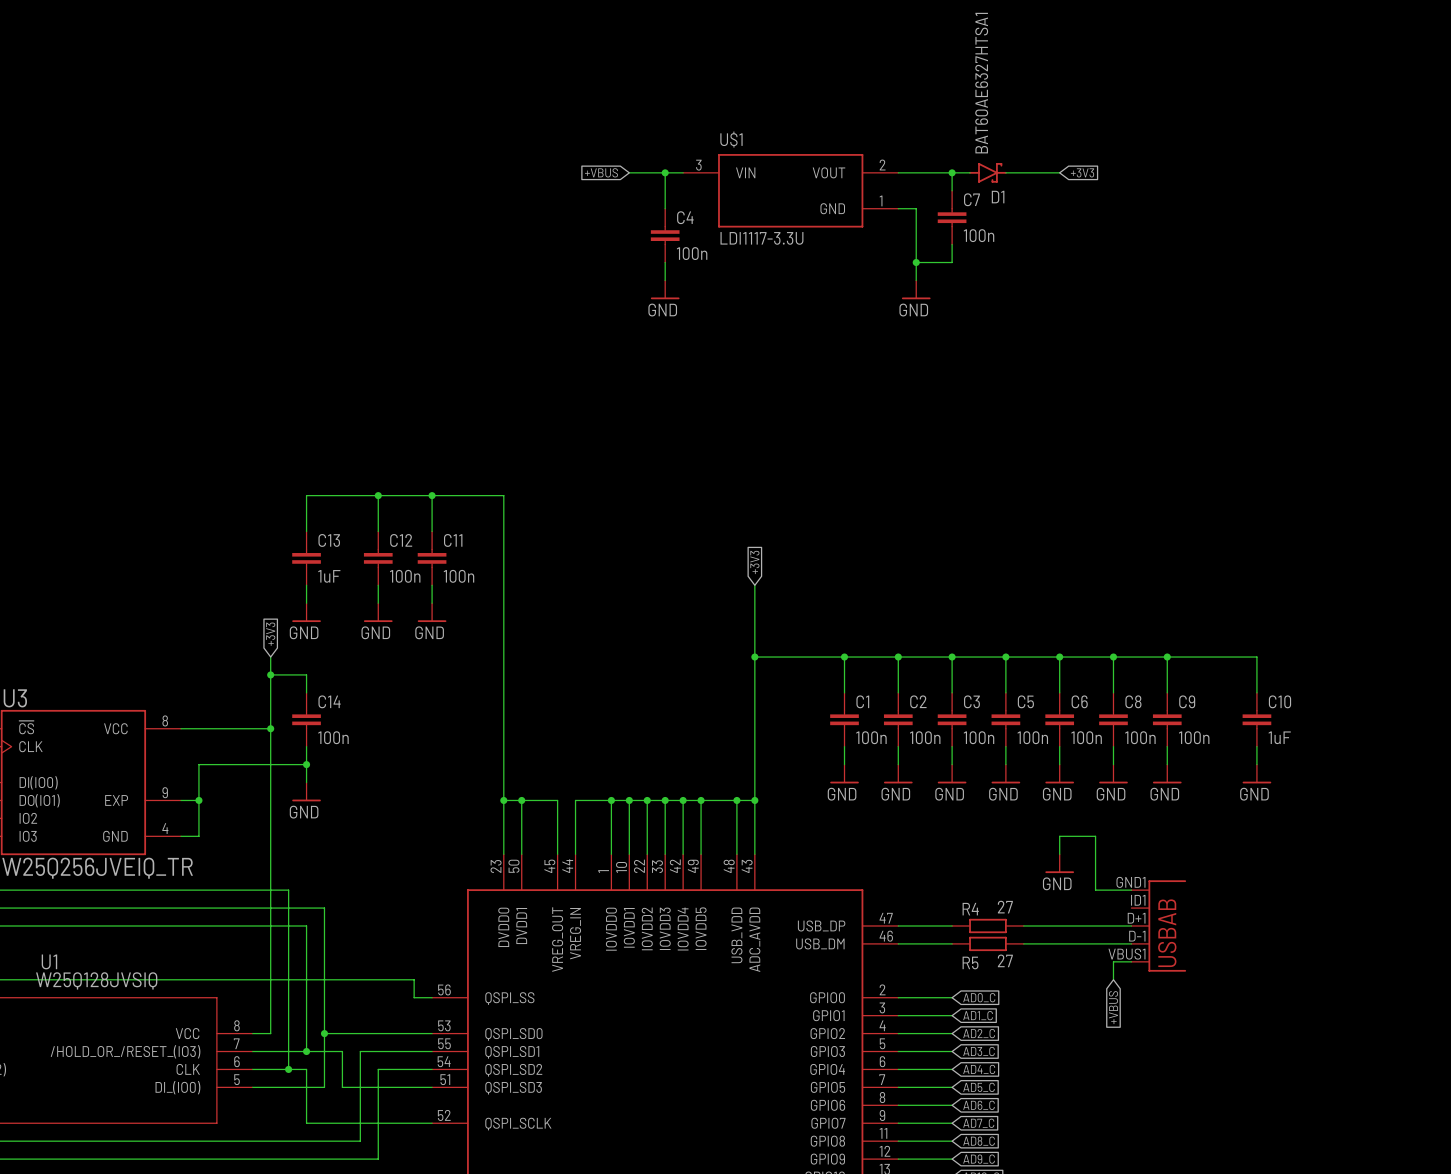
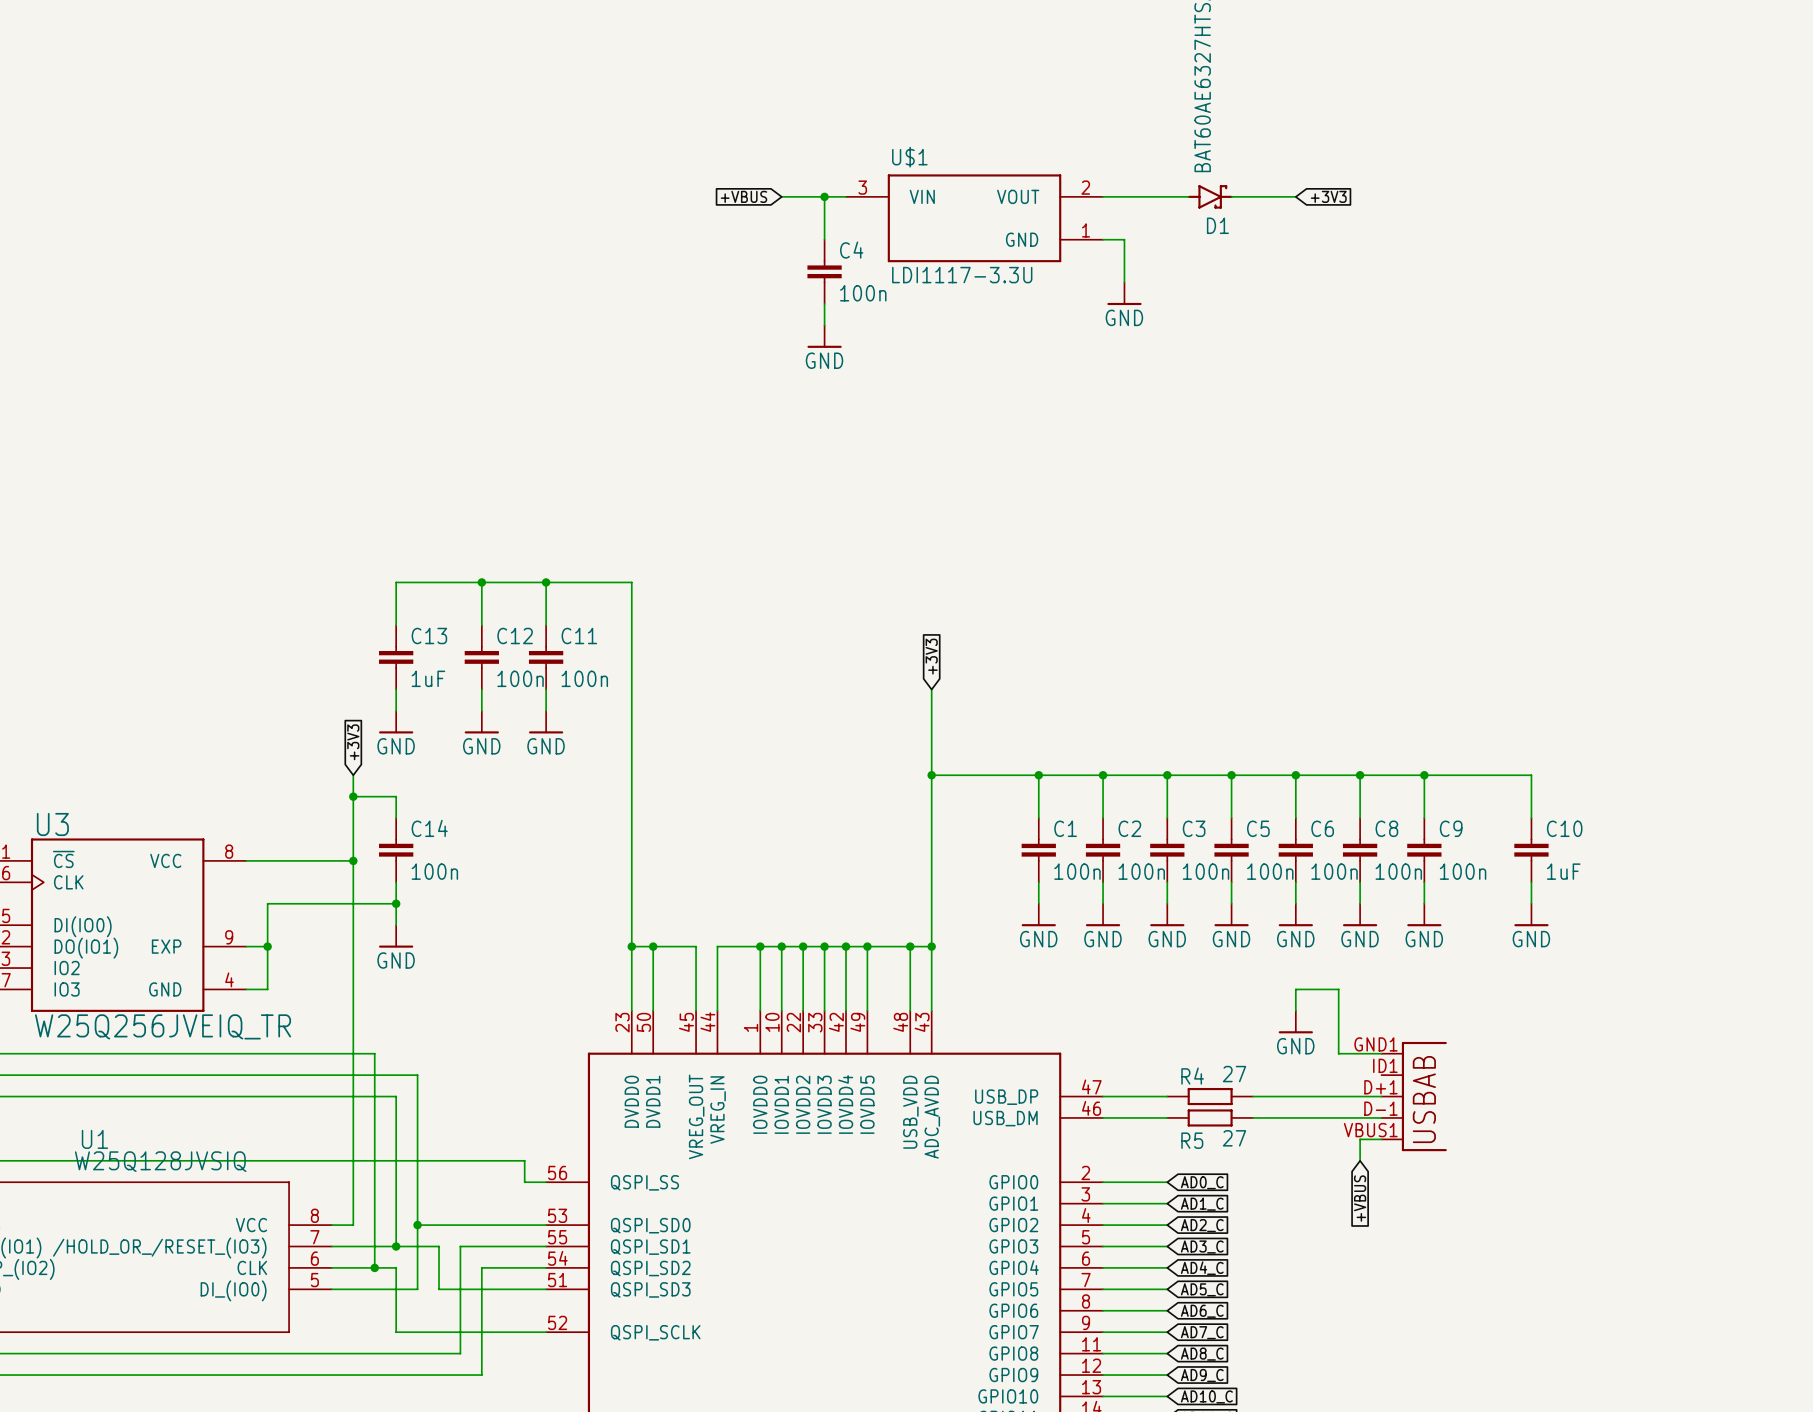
wire: (952, 172) (952, 190) -> none
junction: (952, 172) -> none
C7: 100n (952, 217) -> none
wire: (952, 244) (952, 262) (916, 262) -> none
junction: (916, 262) -> none
power symbol position: GND (916, 289) -> GND (1124, 293)

